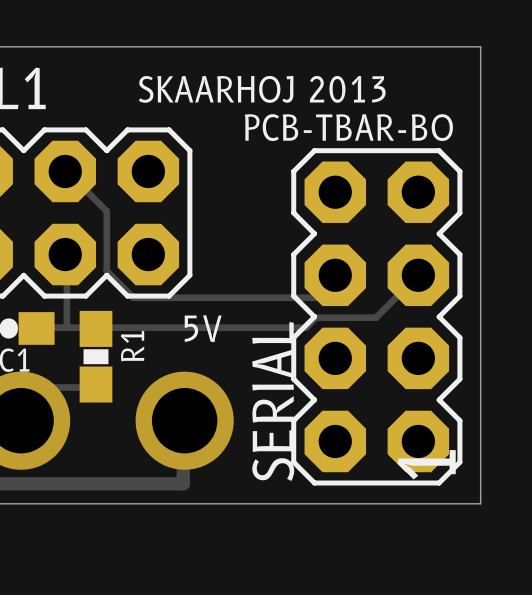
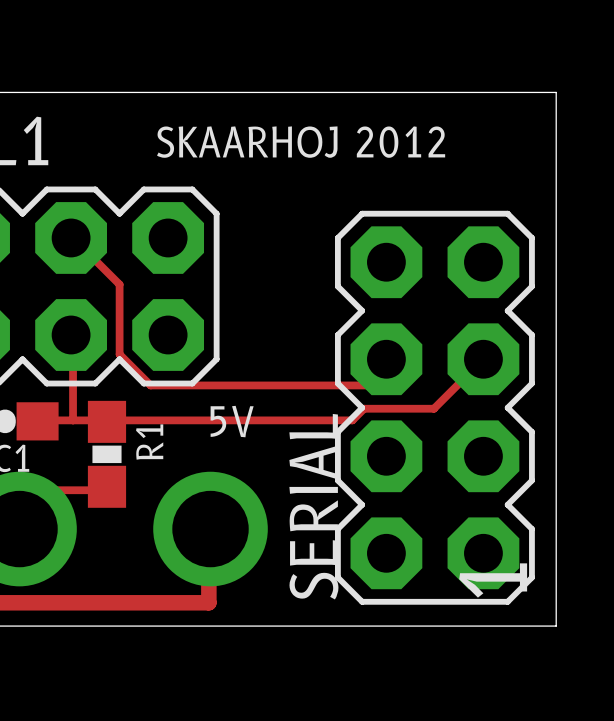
text: SKAARHOJ 2013 (262, 89) -> SKAARHOJ 2012 (301, 142)
text: PCB-TBAR-BO (348, 127) -> none

